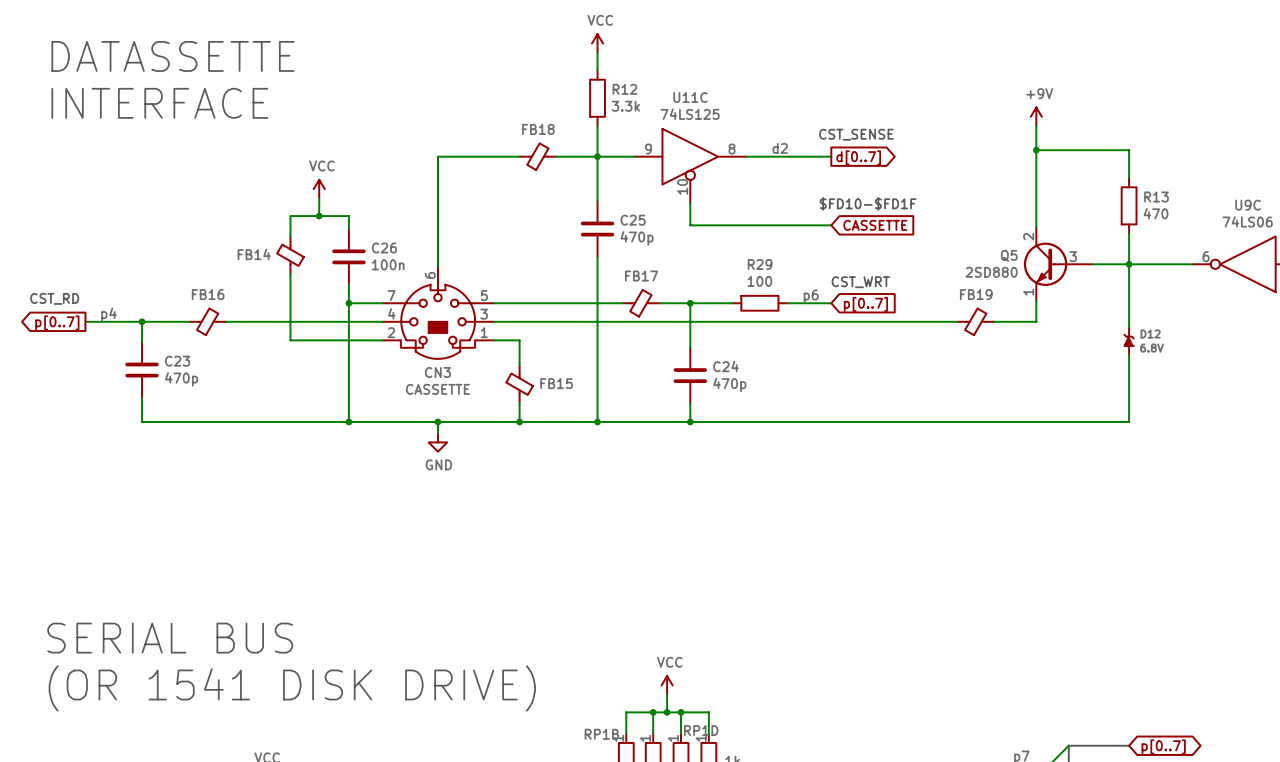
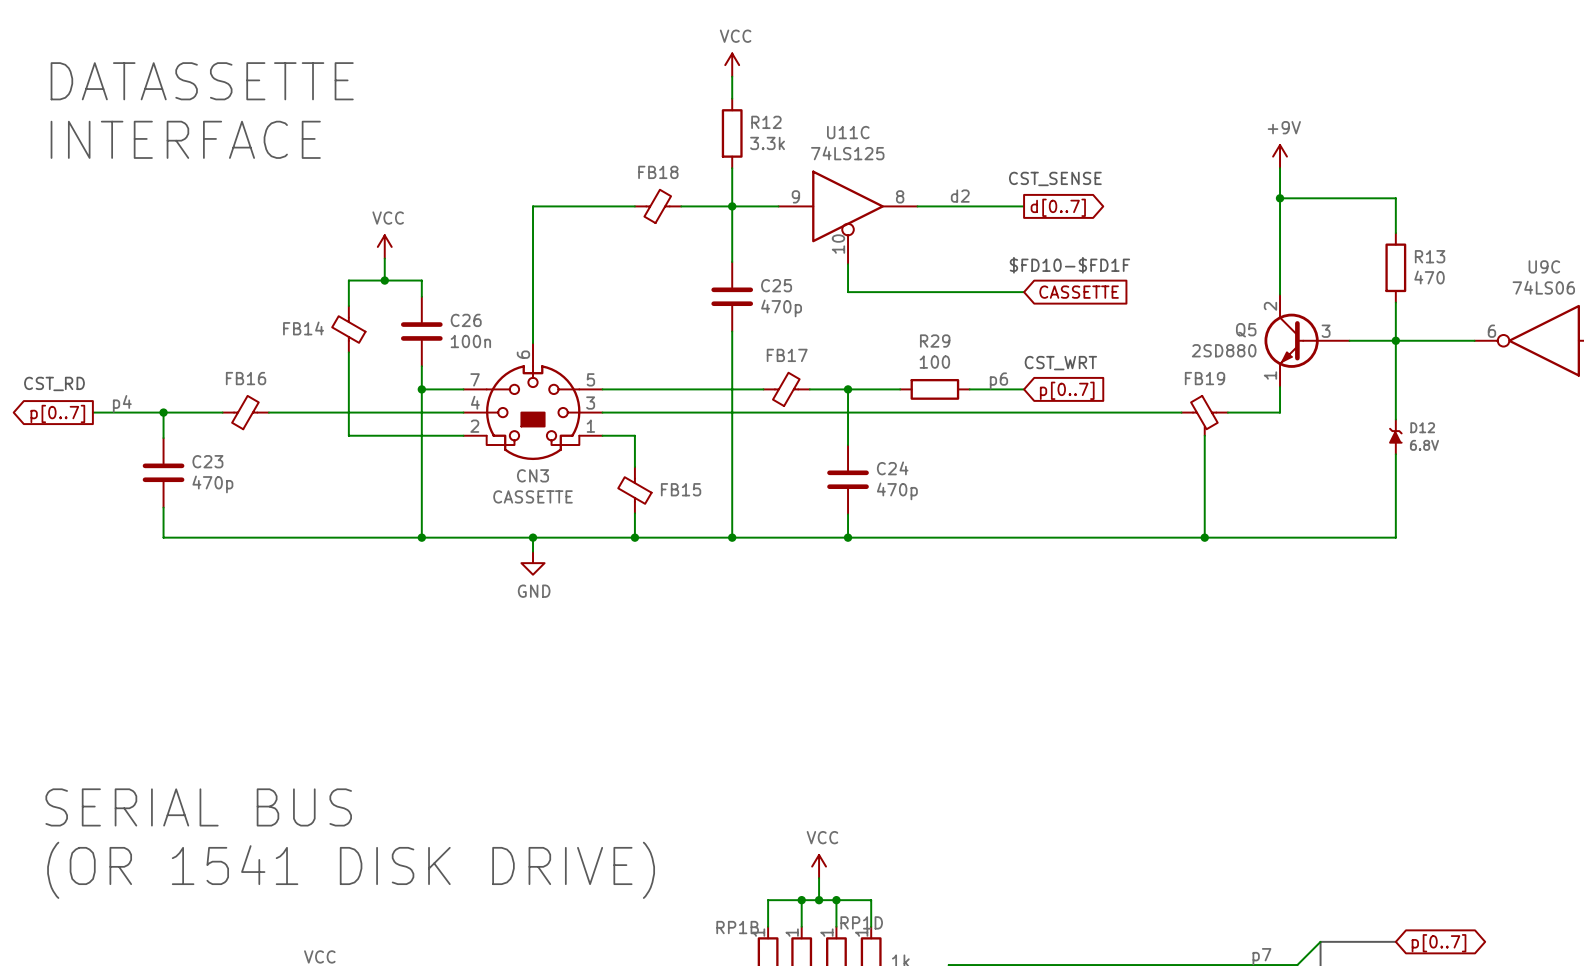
FB19 symbol: [957, 308, 995, 336] -> [1181, 395, 1228, 436]
wire: none -> (1204, 435) (1204, 537)
junction: none -> (1204, 537)

